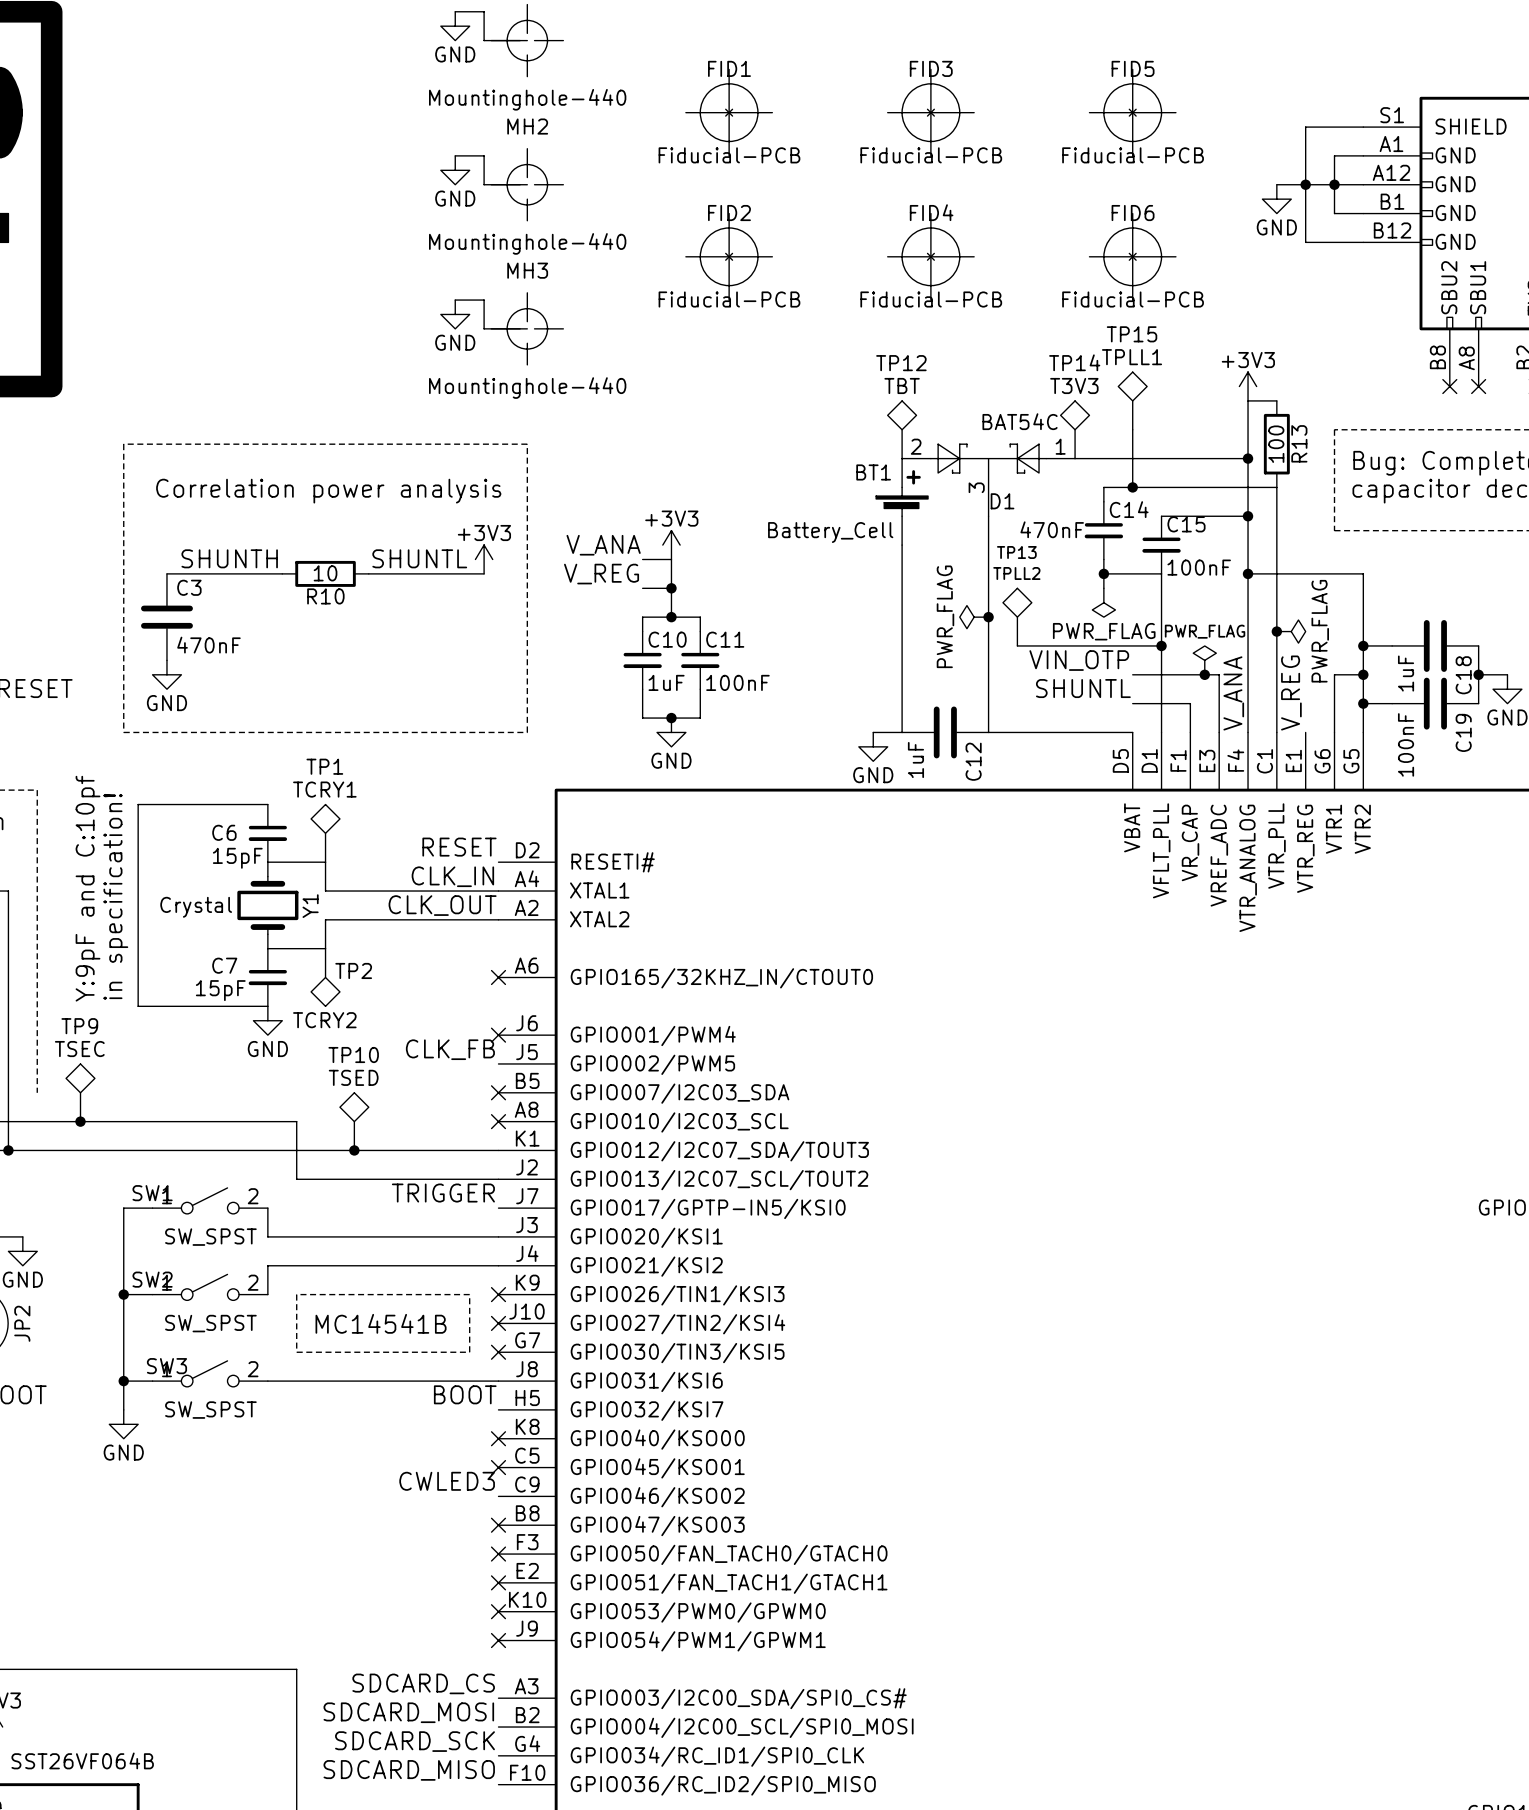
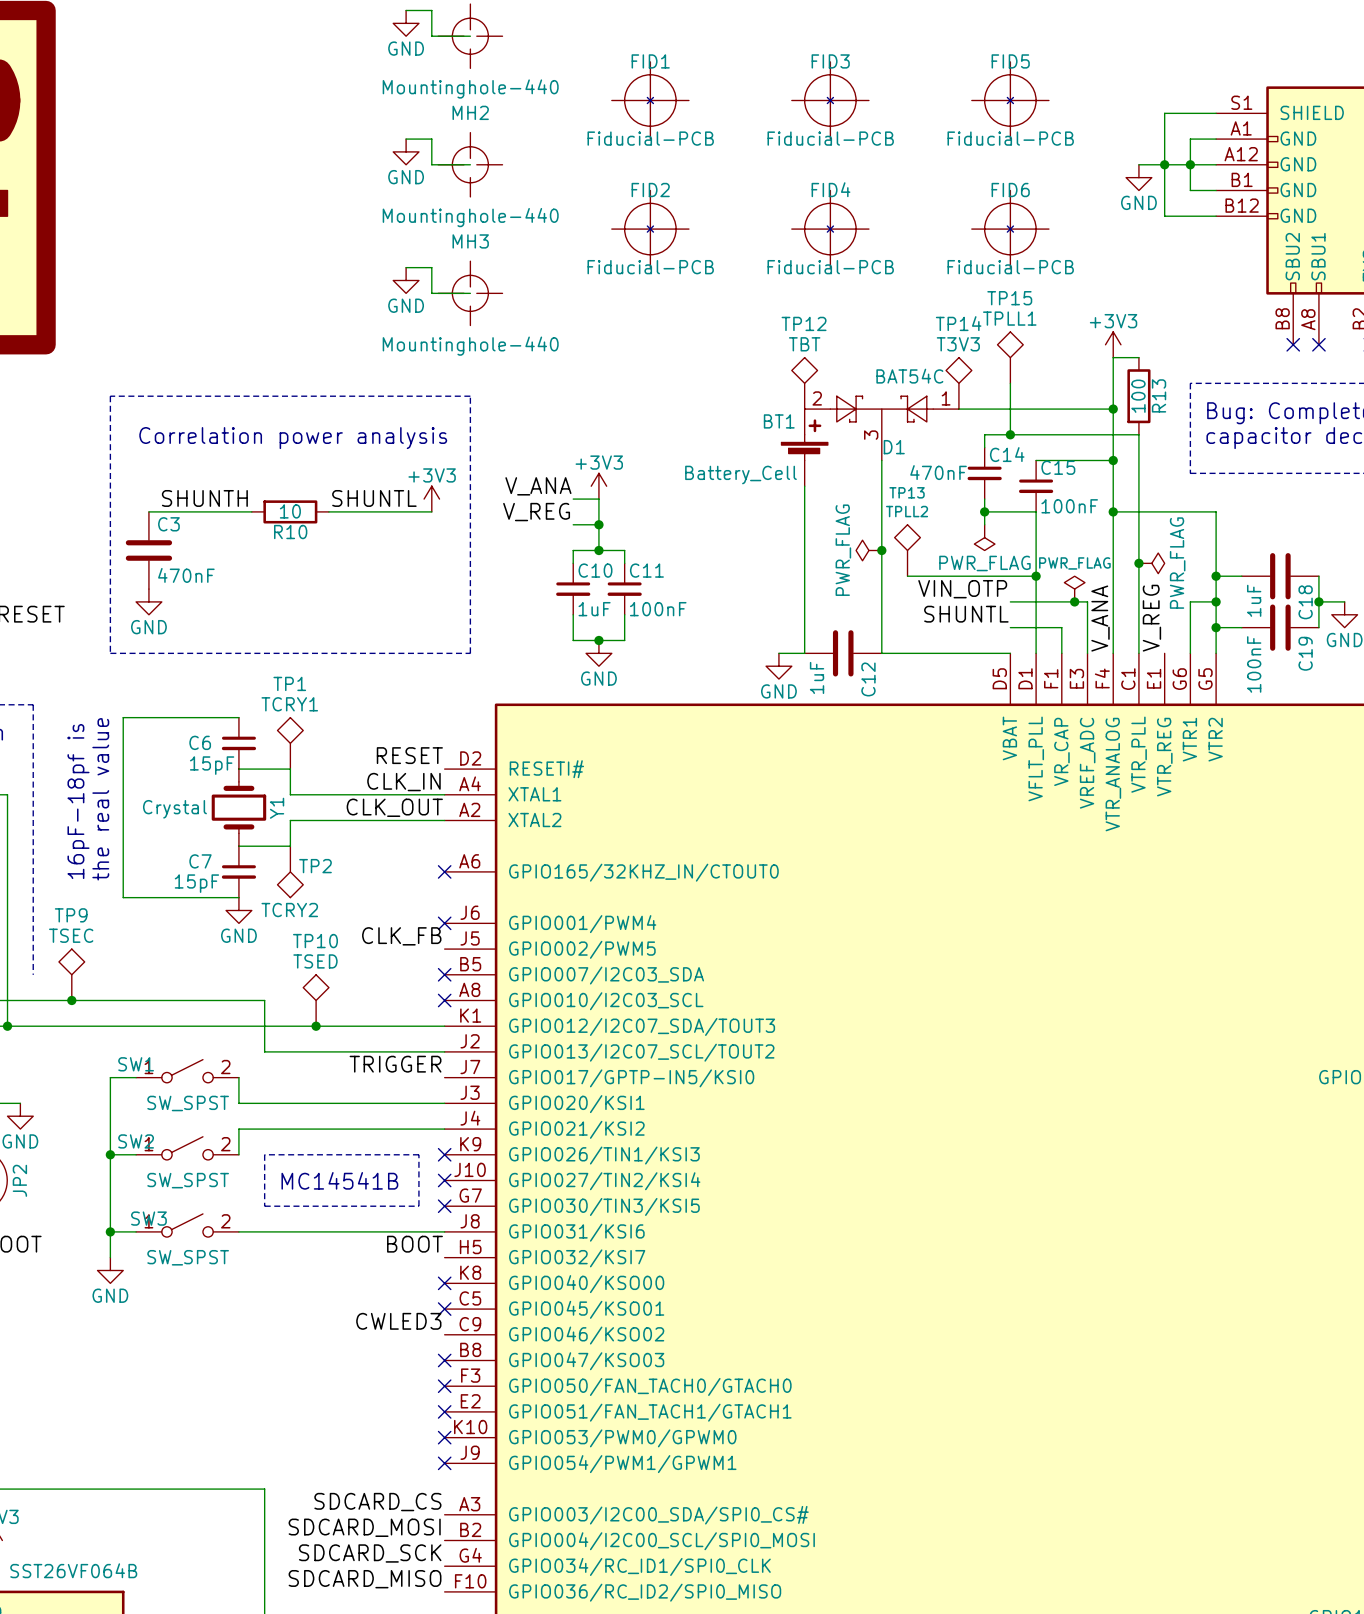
text: Y:9pF and C:10pf (88, 888) -> none
text: none -> the real value (100, 799)
text: in specification! (115, 896) -> none
text: none -> 16pF-18pf is (78, 801)

